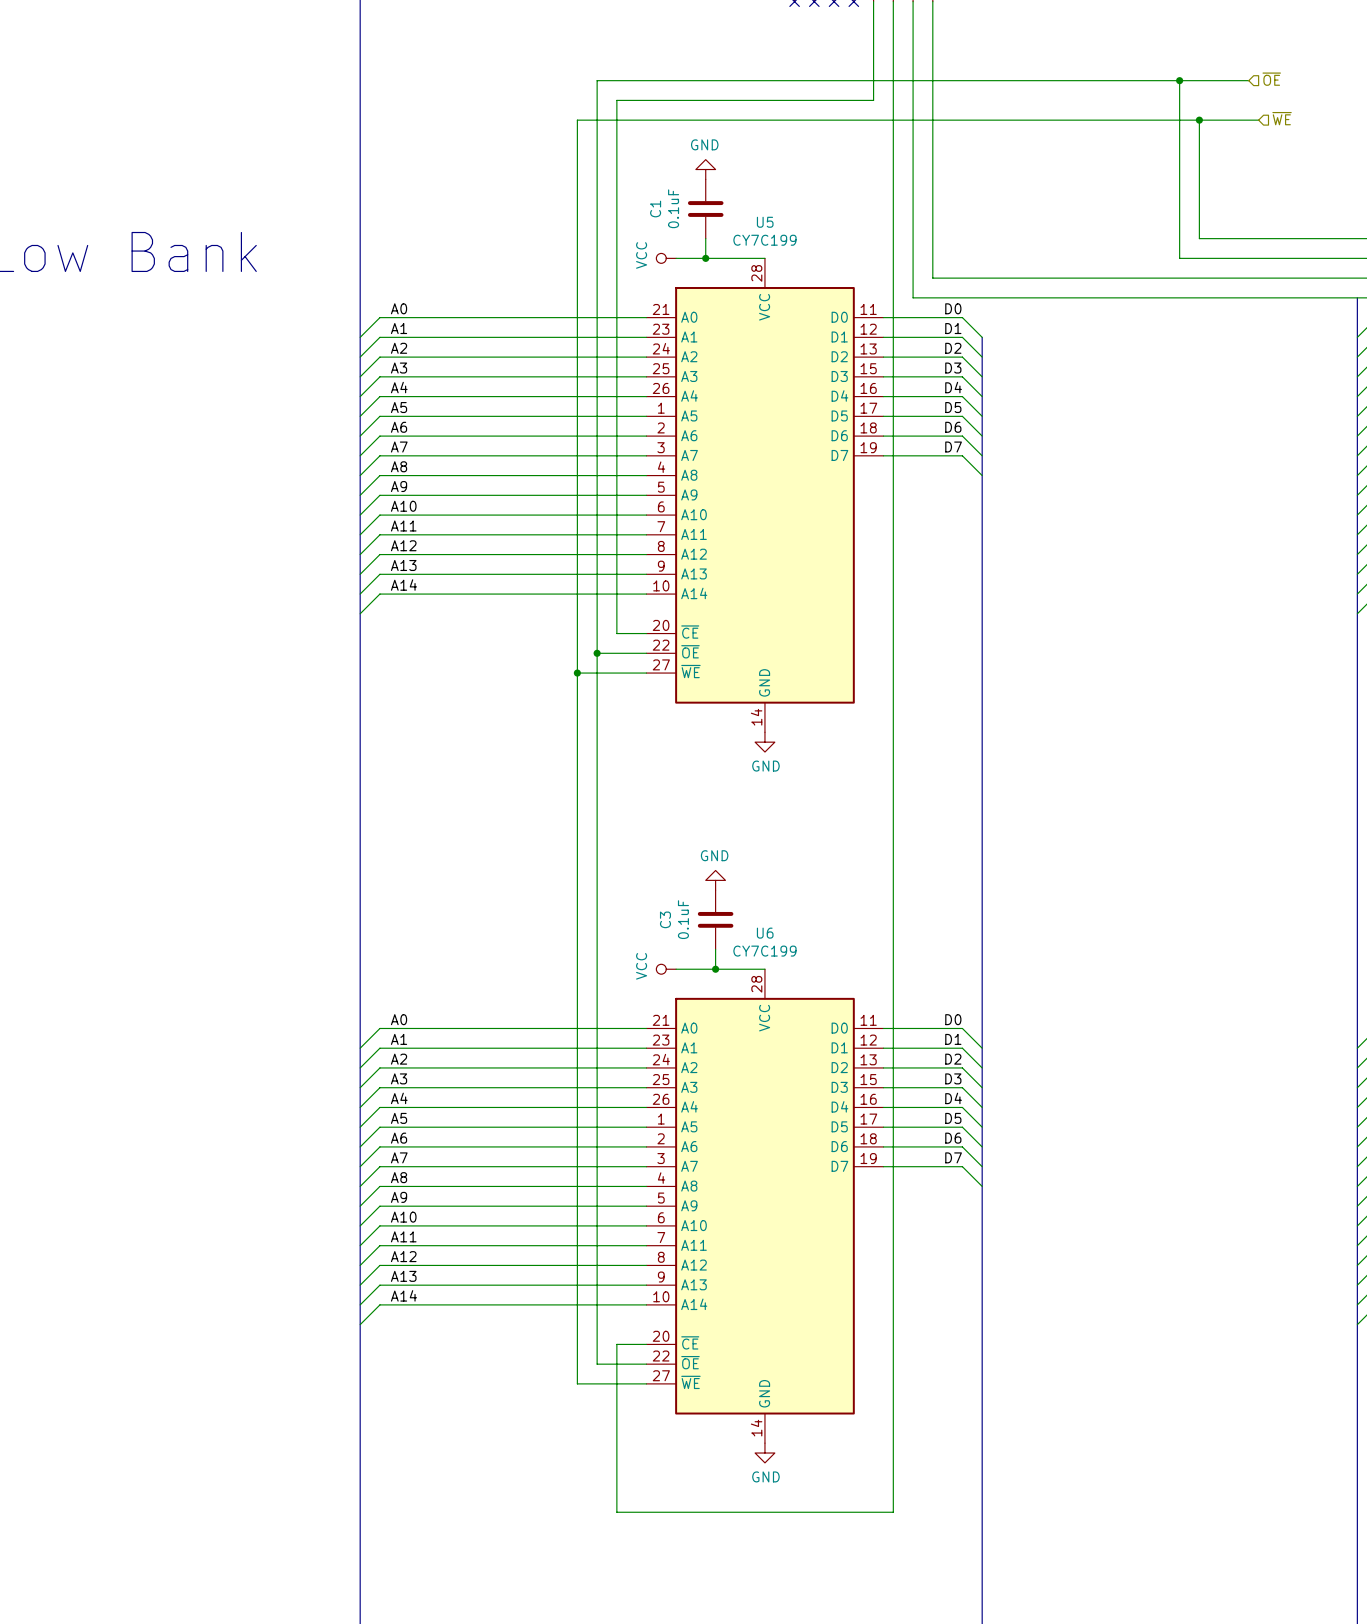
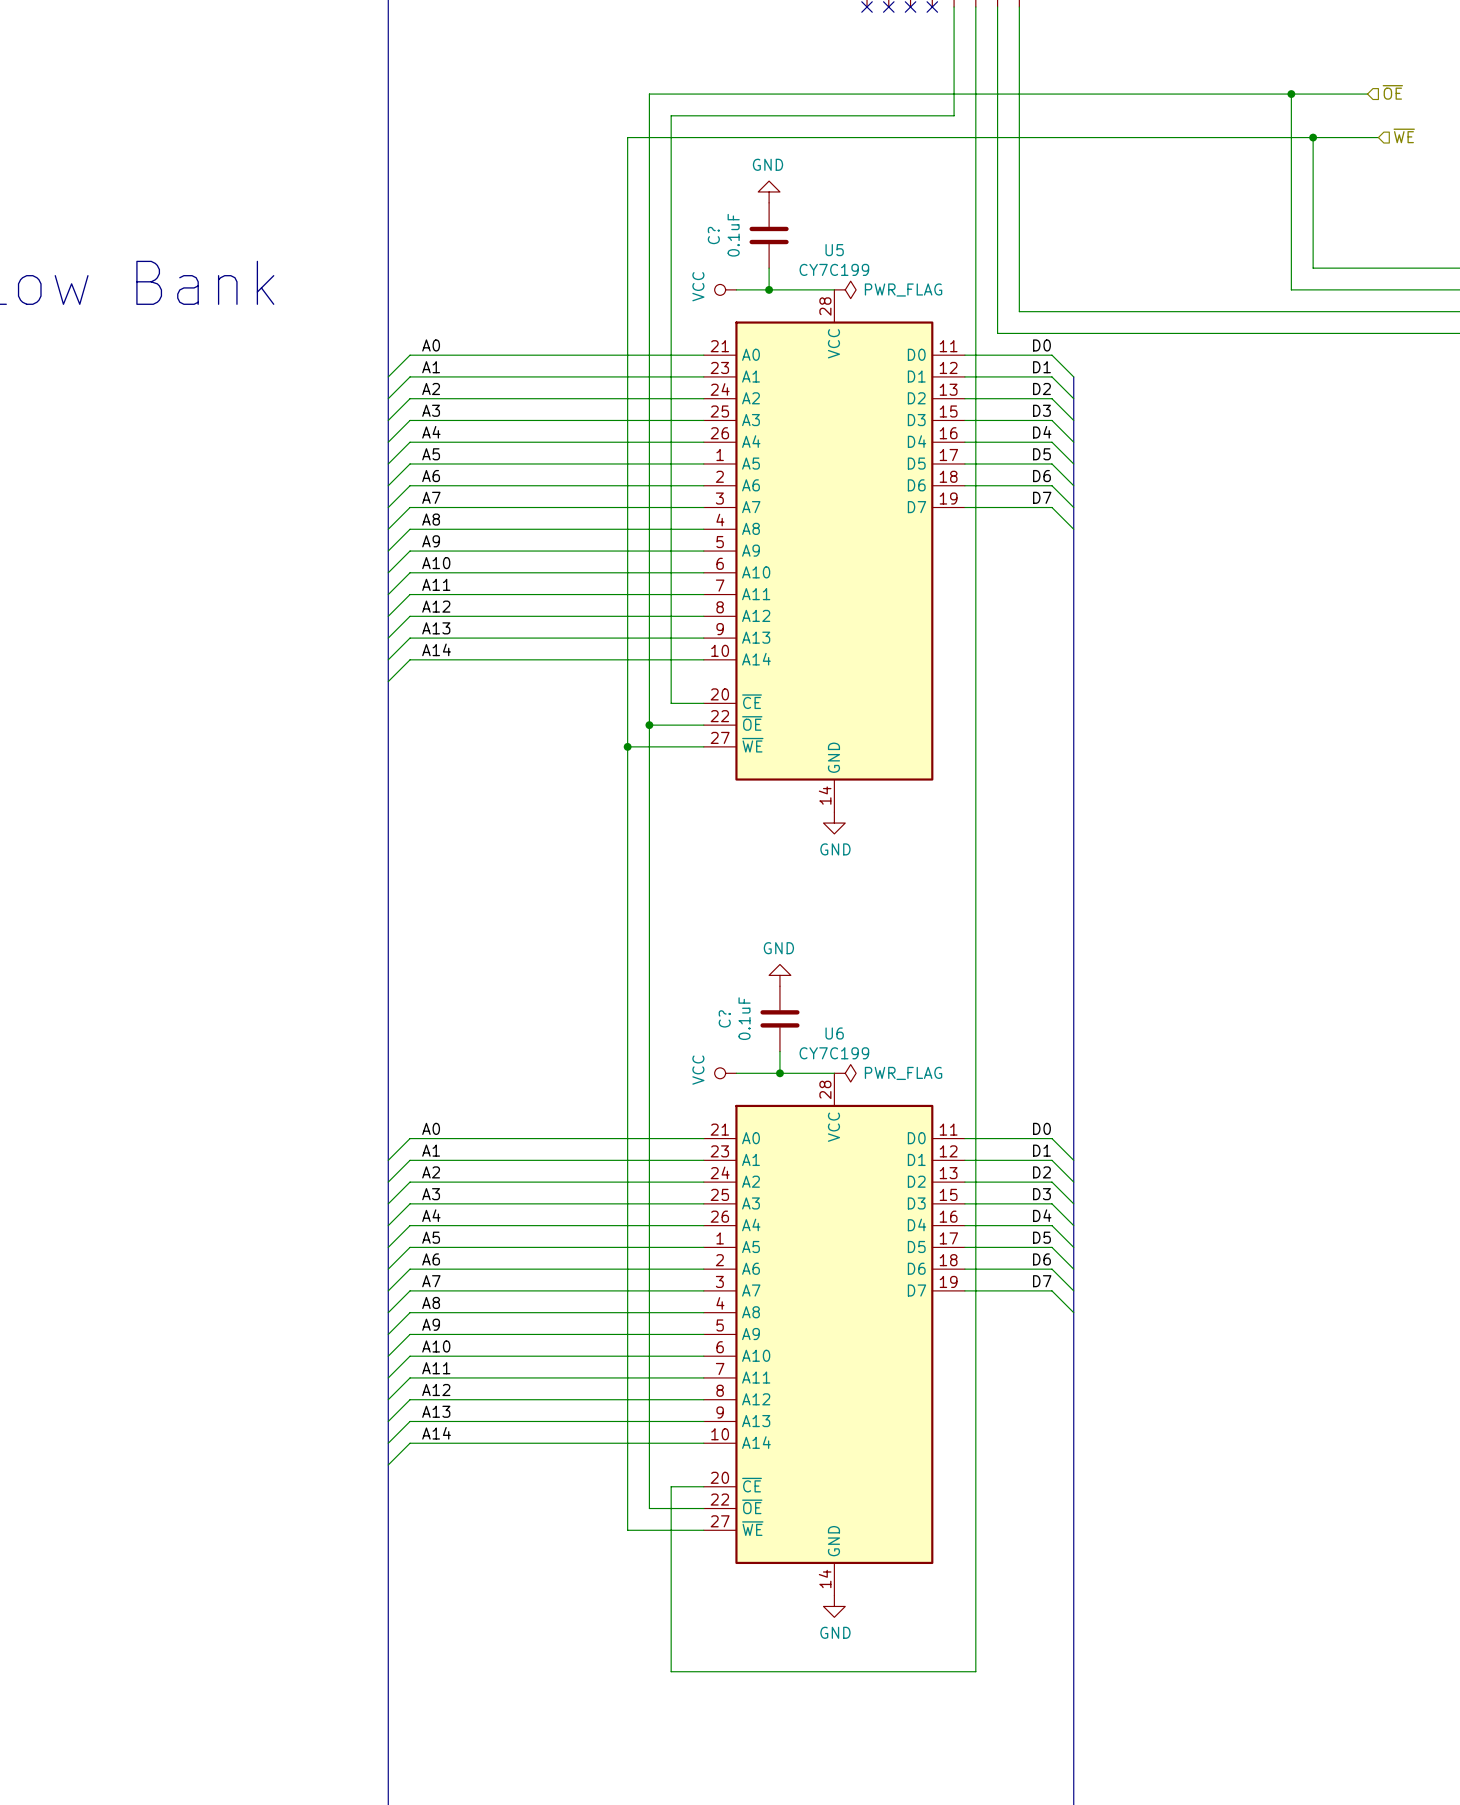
C1 name: C1 (655, 209) -> C? (713, 235)
power symbol: none -> PWR_FLAG (845, 289)
C3 name: C3 (665, 919) -> C? (724, 1018)
power symbol: none -> PWR_FLAG (845, 1073)

